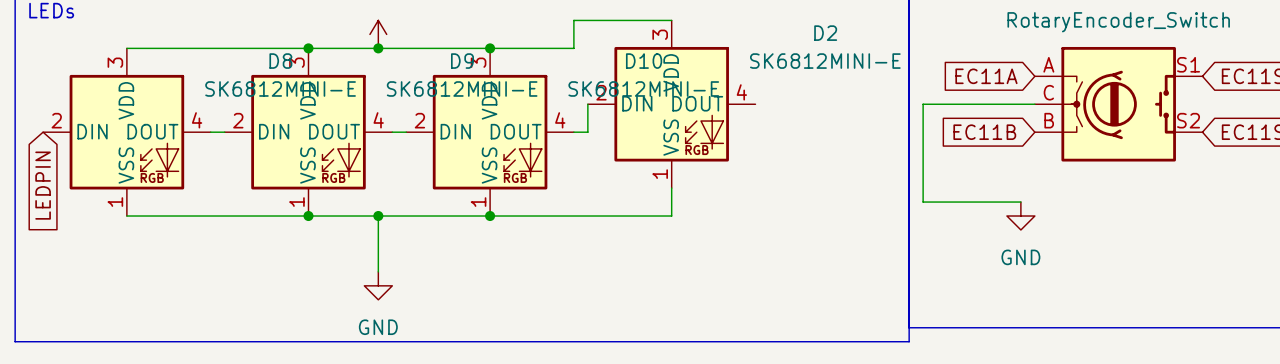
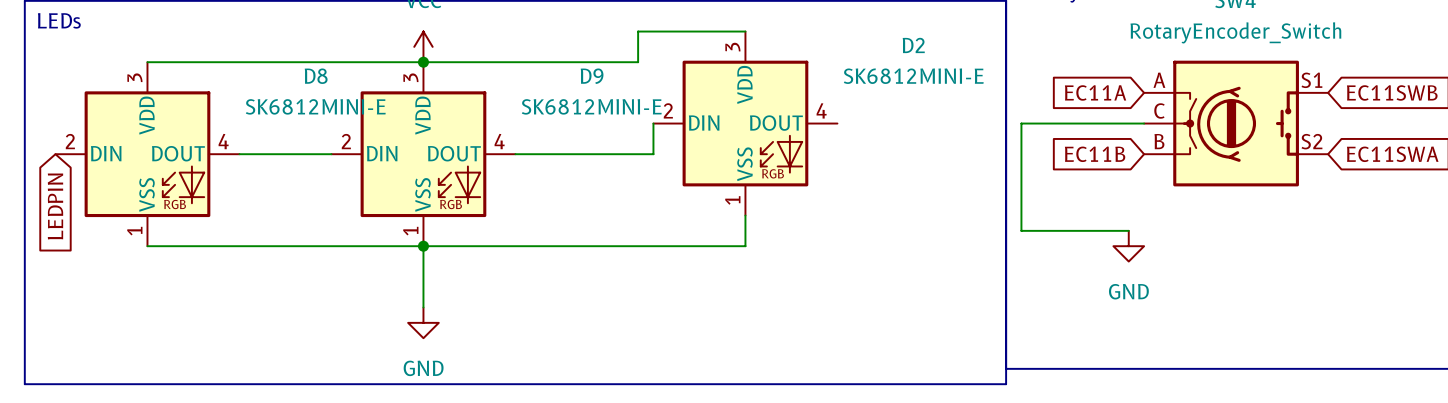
junction: (308, 48) -> none
junction: (490, 48) -> none
D9 position: (308, 132) -> (423, 154)
D10: SK6812MINI-E (490, 132) -> none
junction: (308, 216) -> none
junction: (490, 216) -> none

